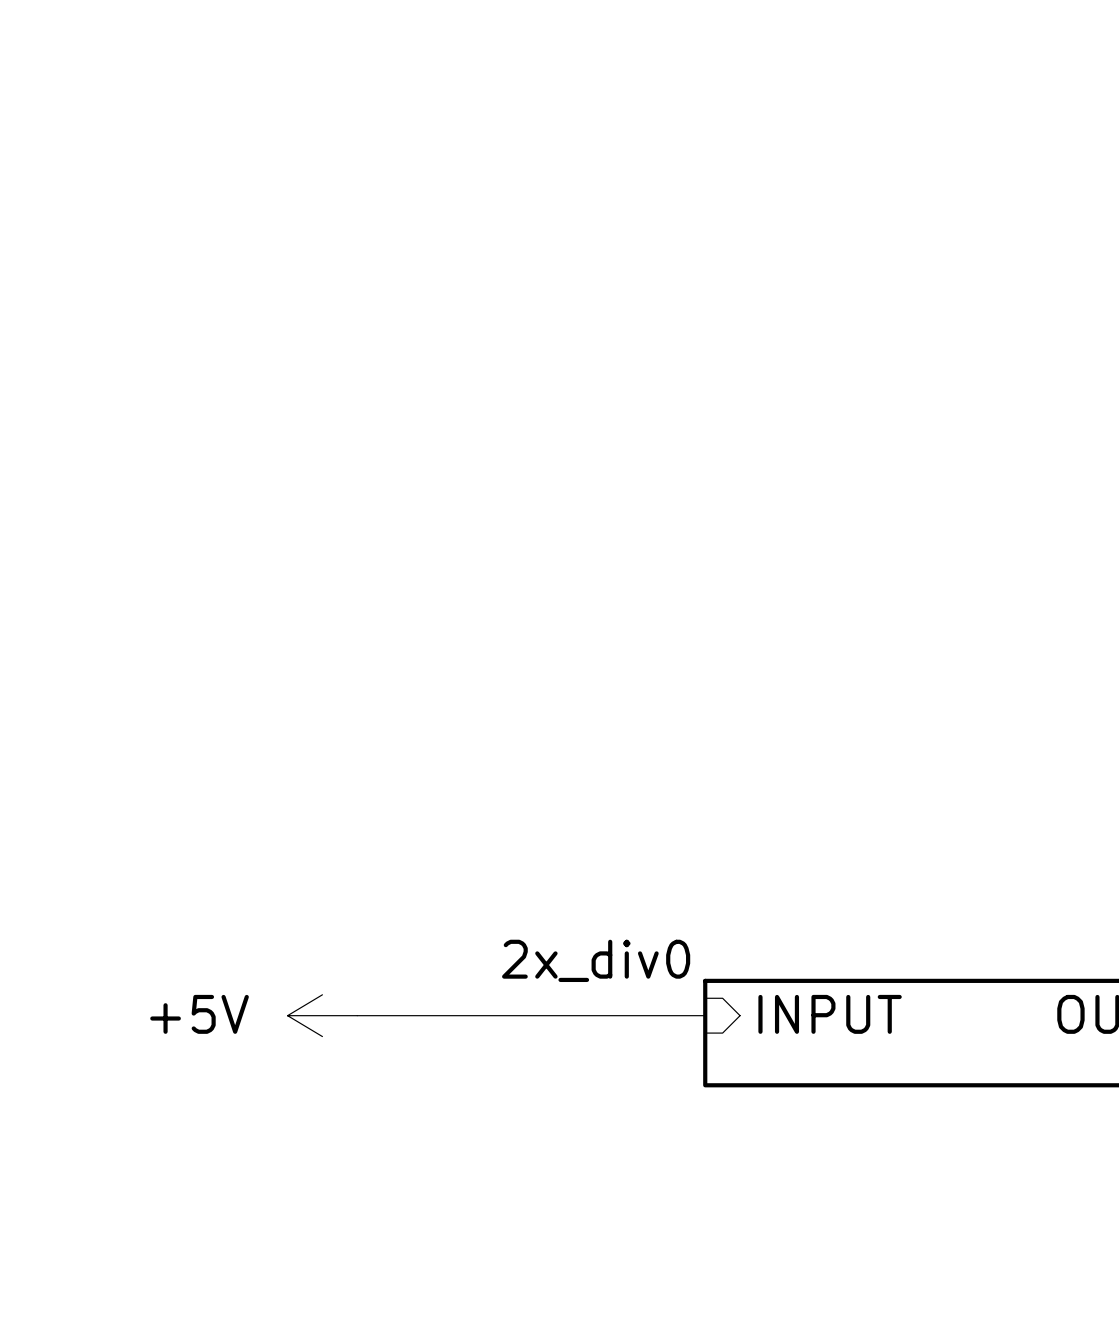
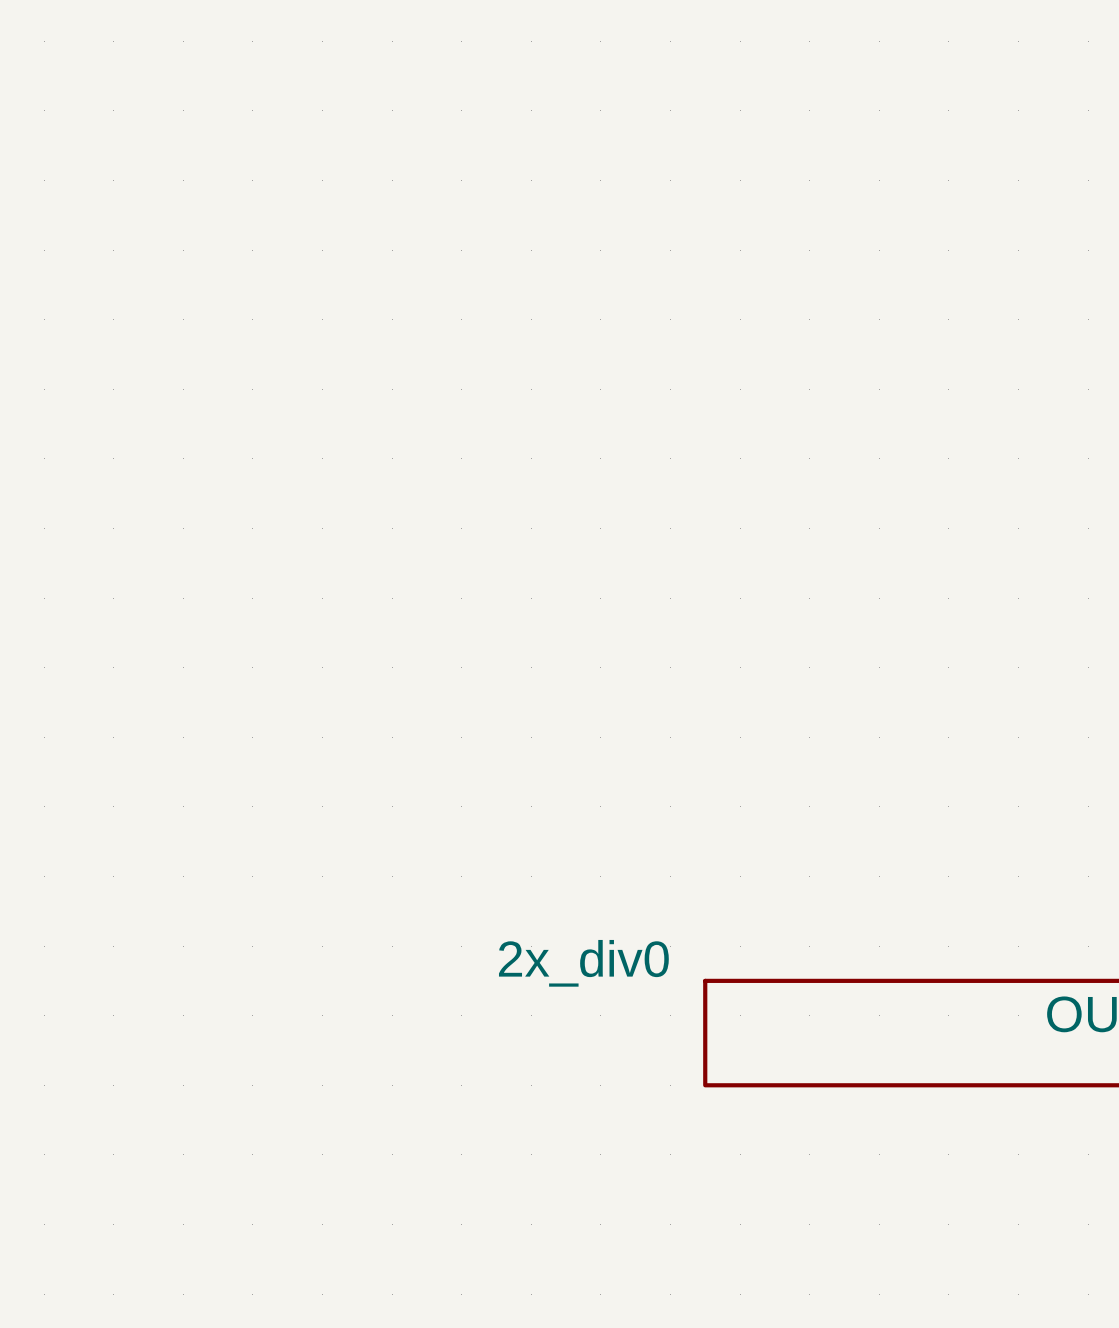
sheet pin: INPUT (830, 1014) -> none
power symbol: +5V (322, 1015) -> none
wire: (357, 1015) (705, 1015) -> none

